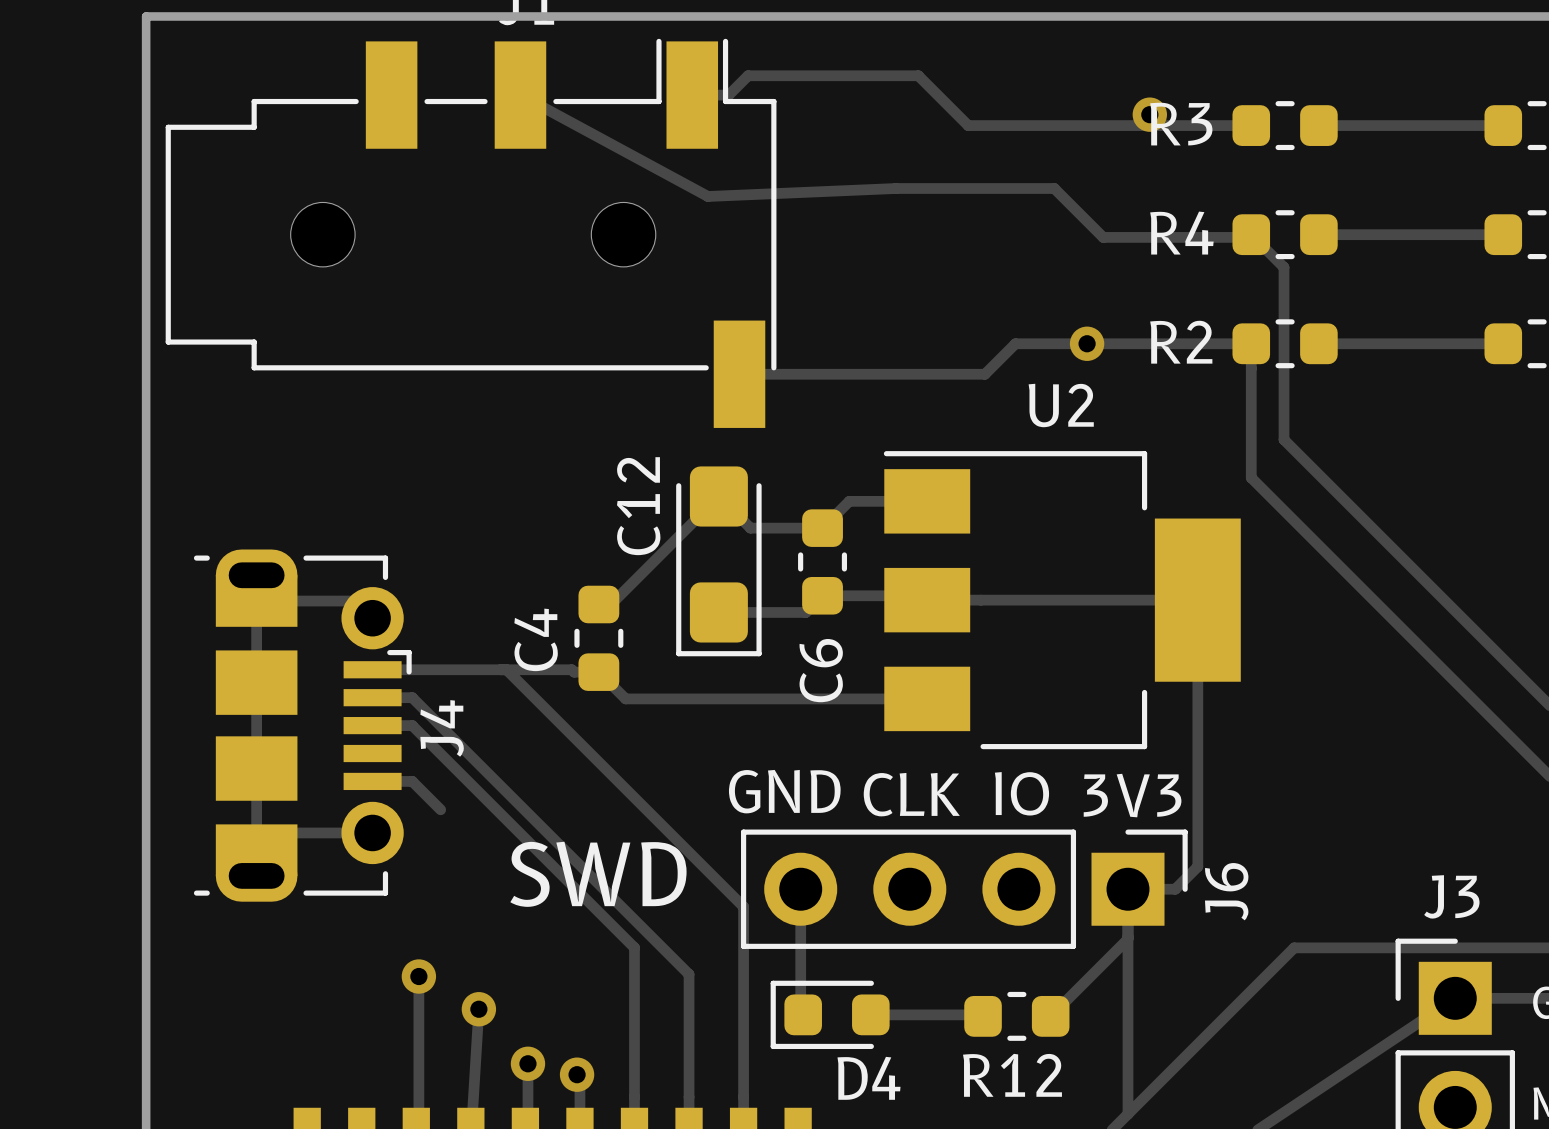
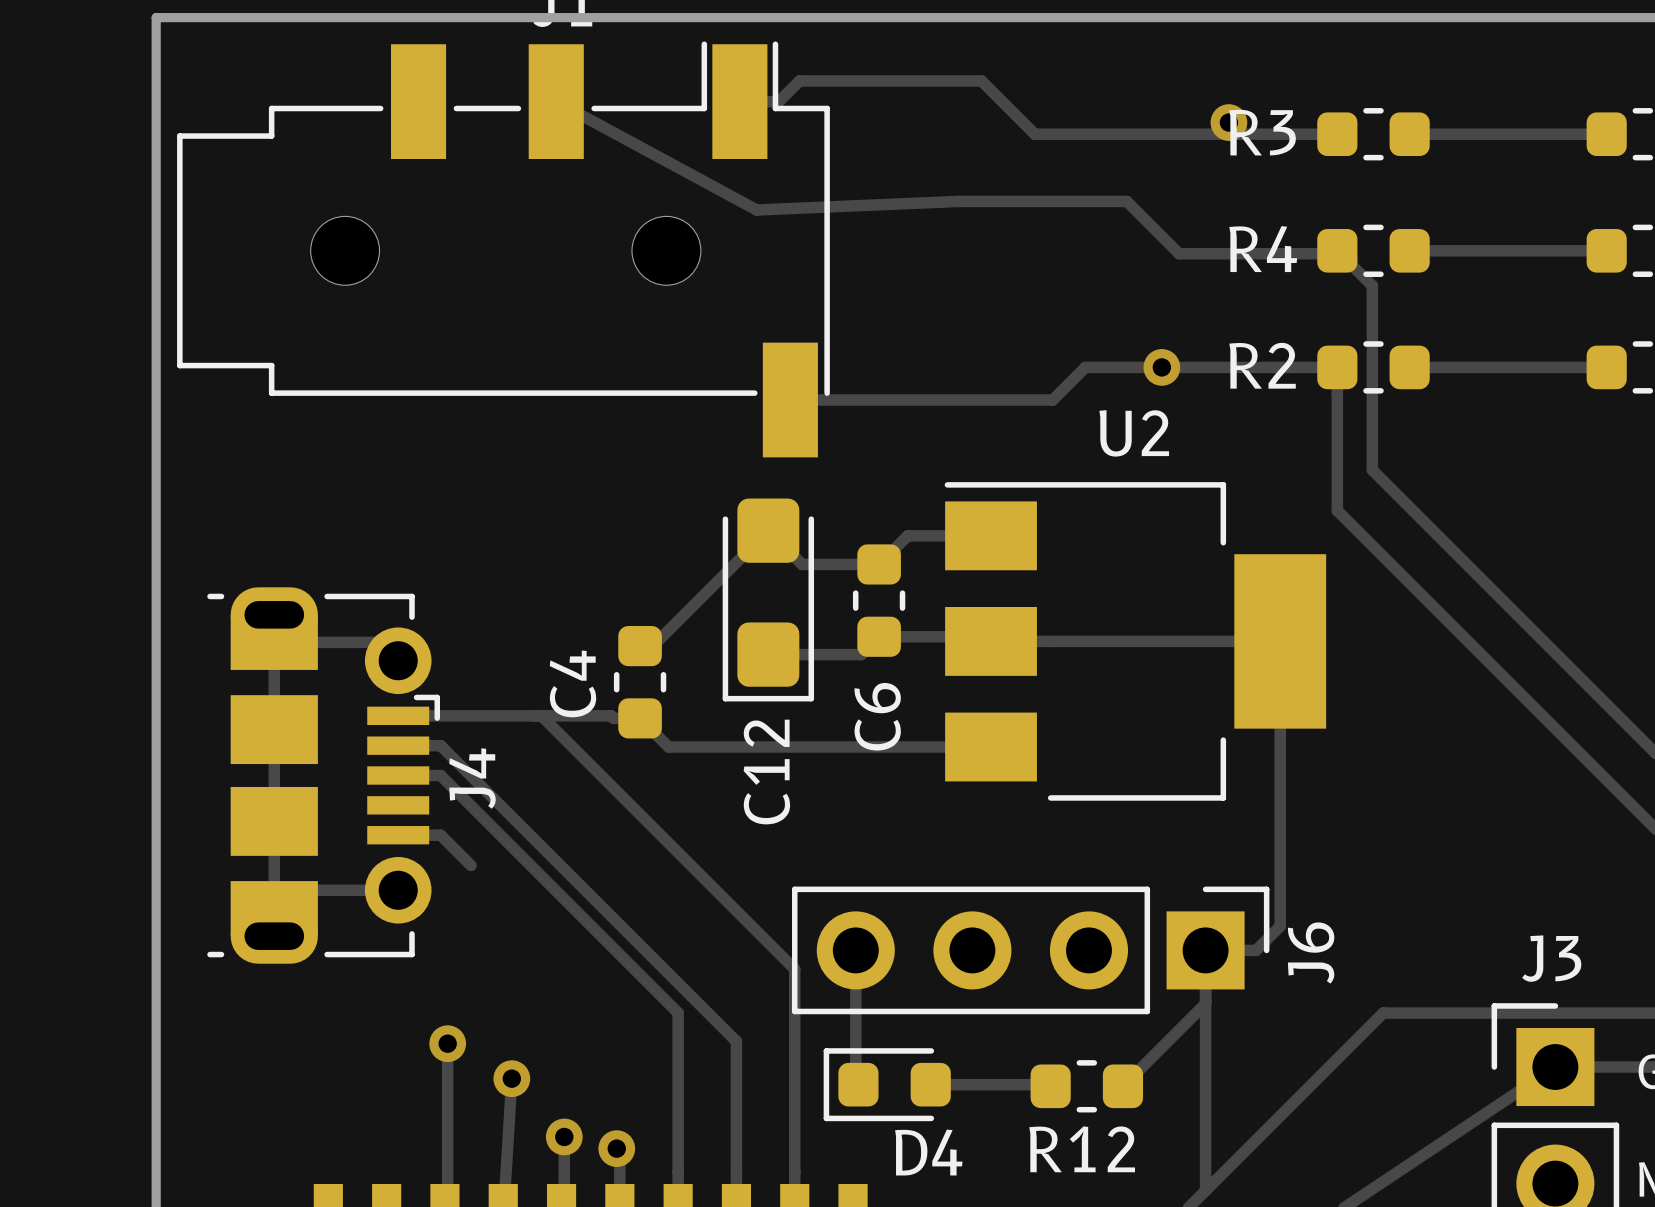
C12 name position: C12 (638, 506) -> C12 (766, 772)
text: GND (784, 791) -> none
text: IO (1021, 793) -> none
text: CLK (911, 794) -> none
text: 3V3 (1132, 795) -> none
text: SWD (598, 874) -> none

